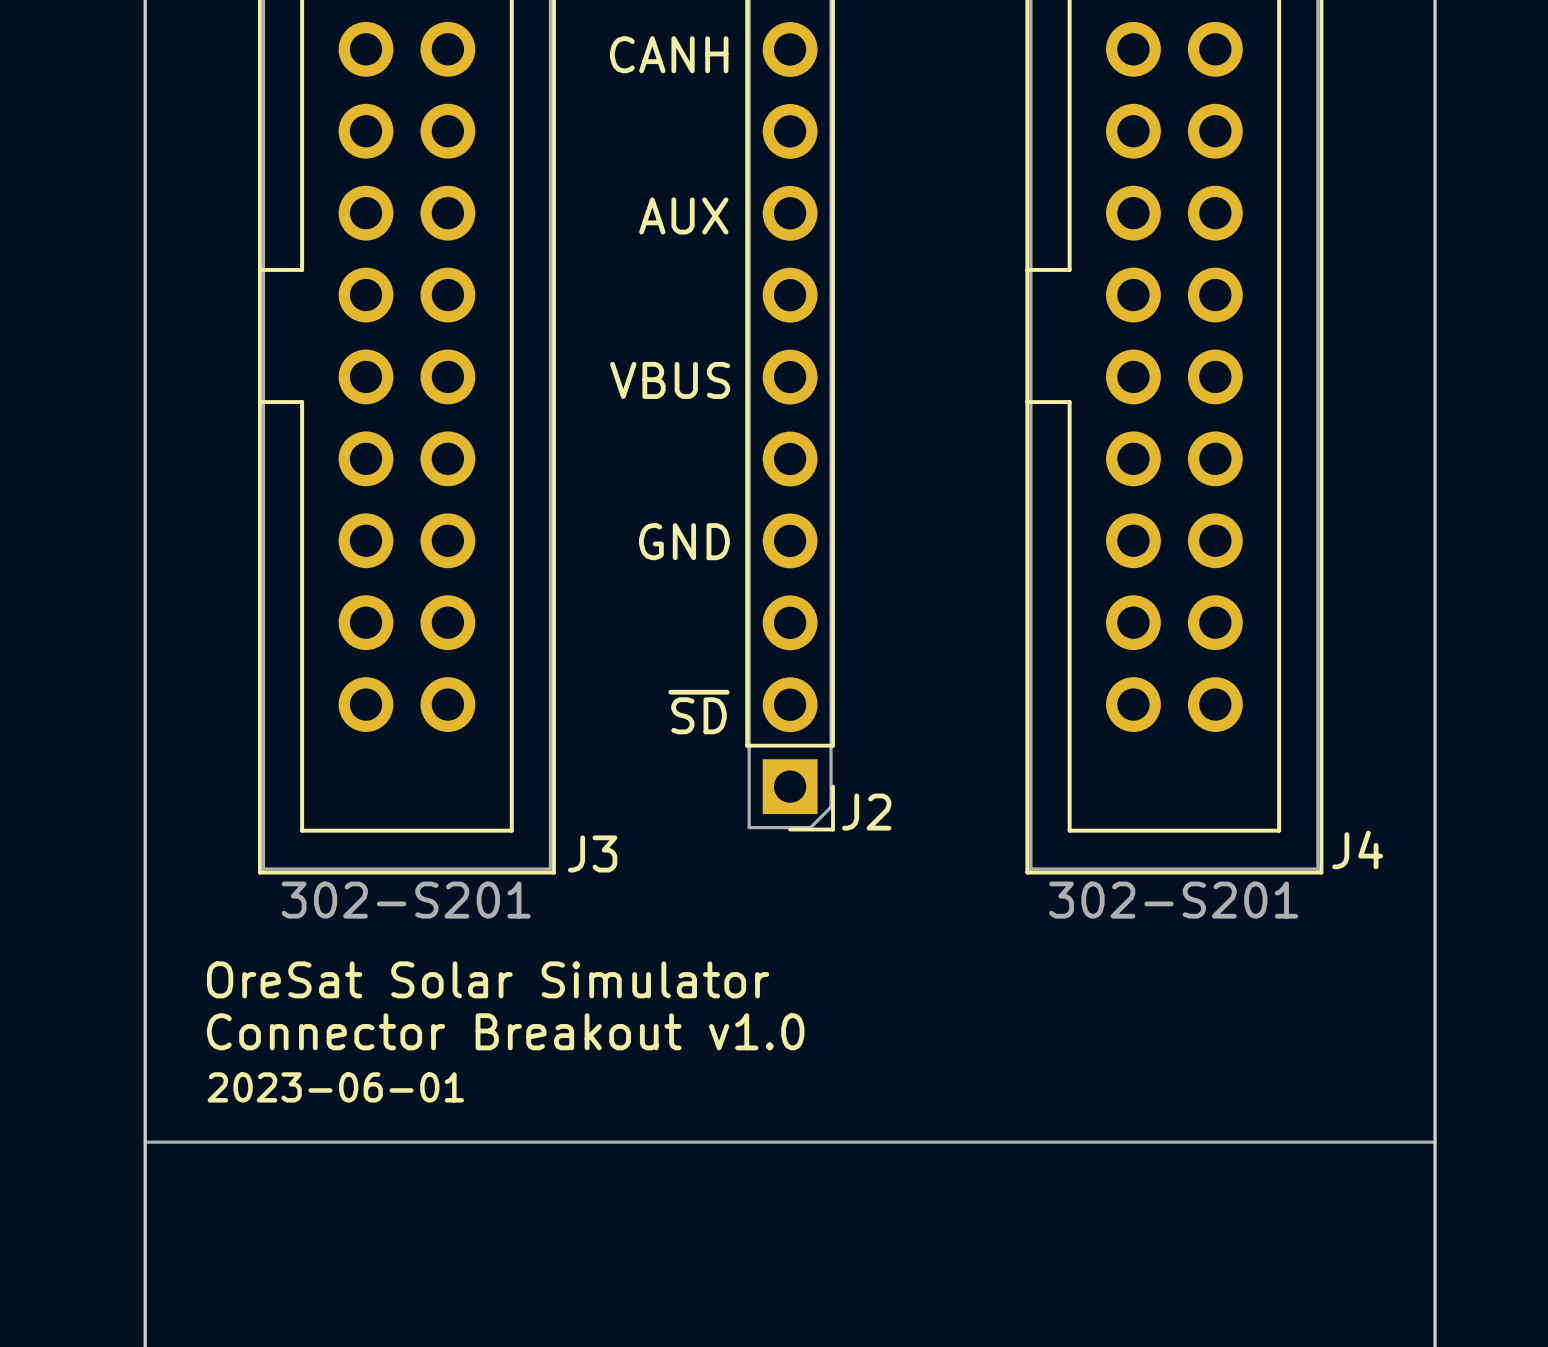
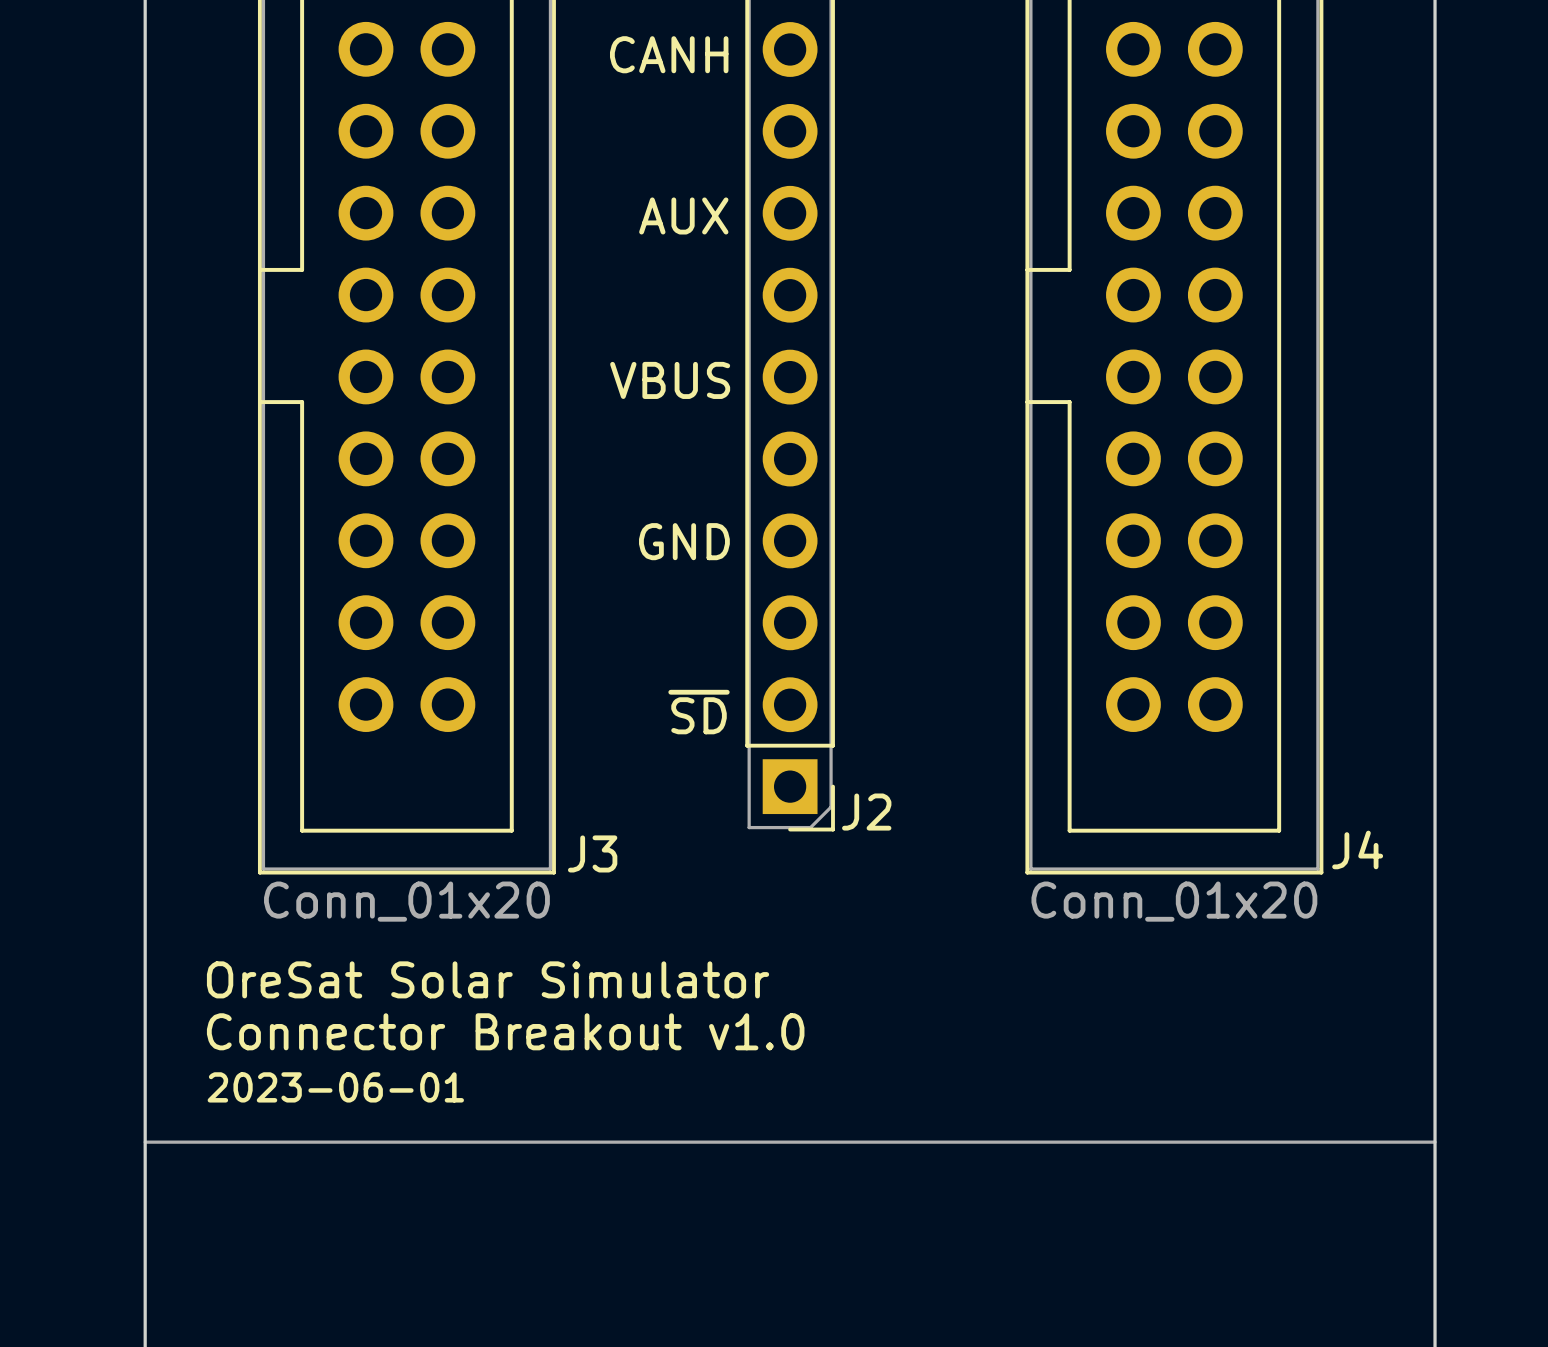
J3 value: 302-S201 (406, 900) -> Conn_01x20 (406, 901)
J4 value: 302-S201 (1173, 900) -> Conn_01x20 (1174, 901)

